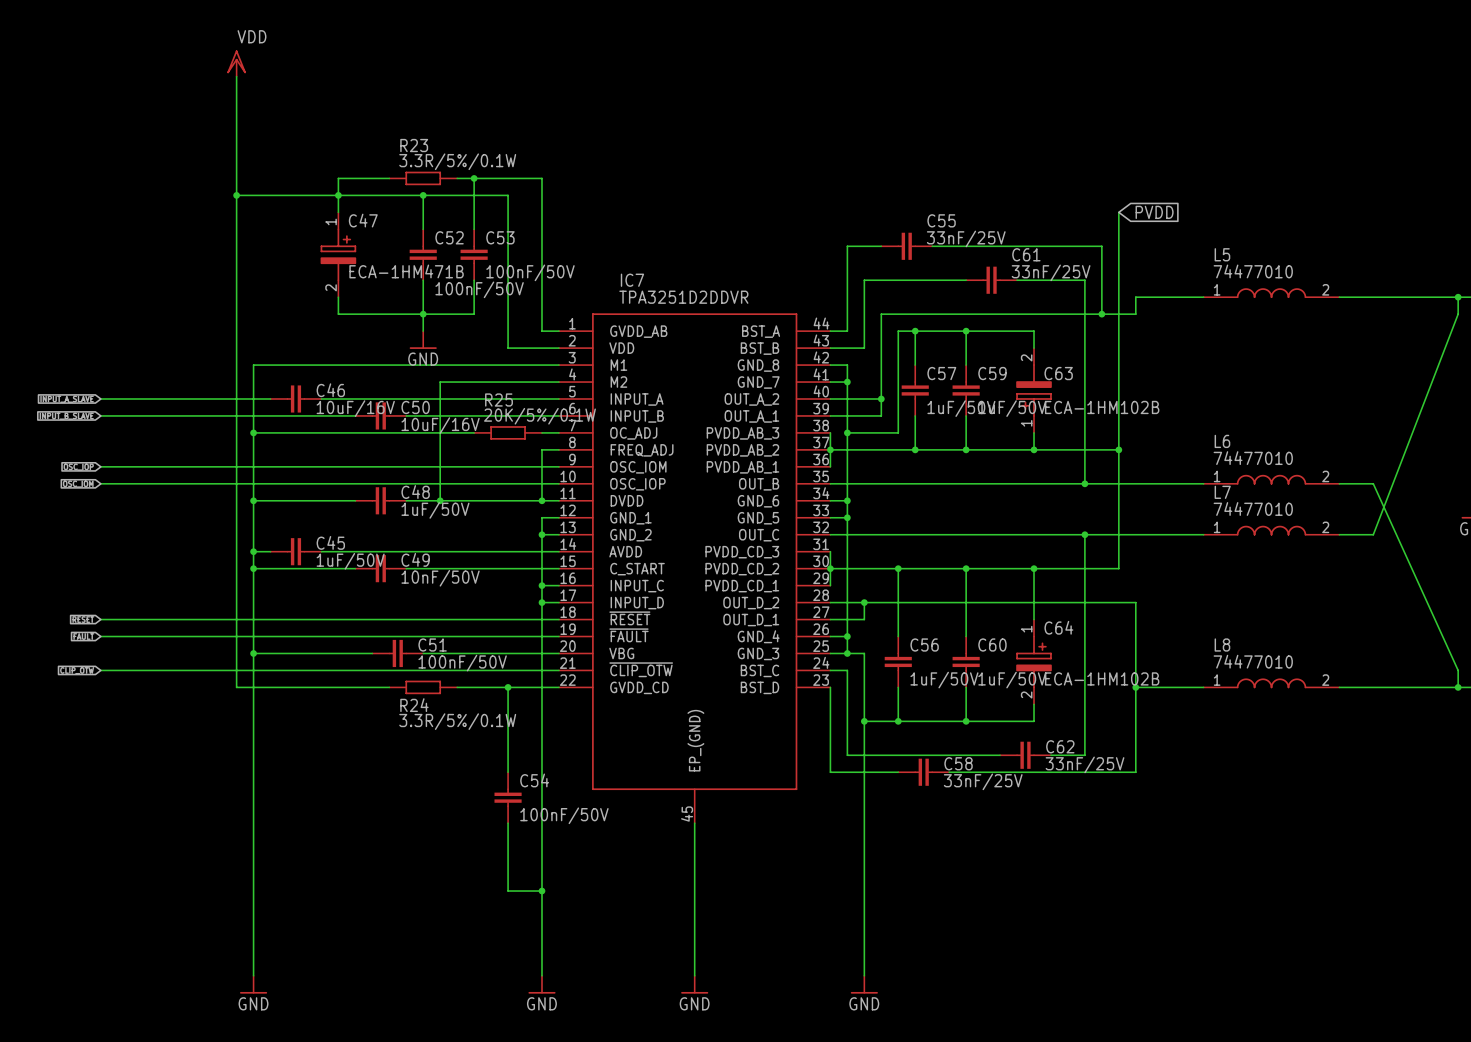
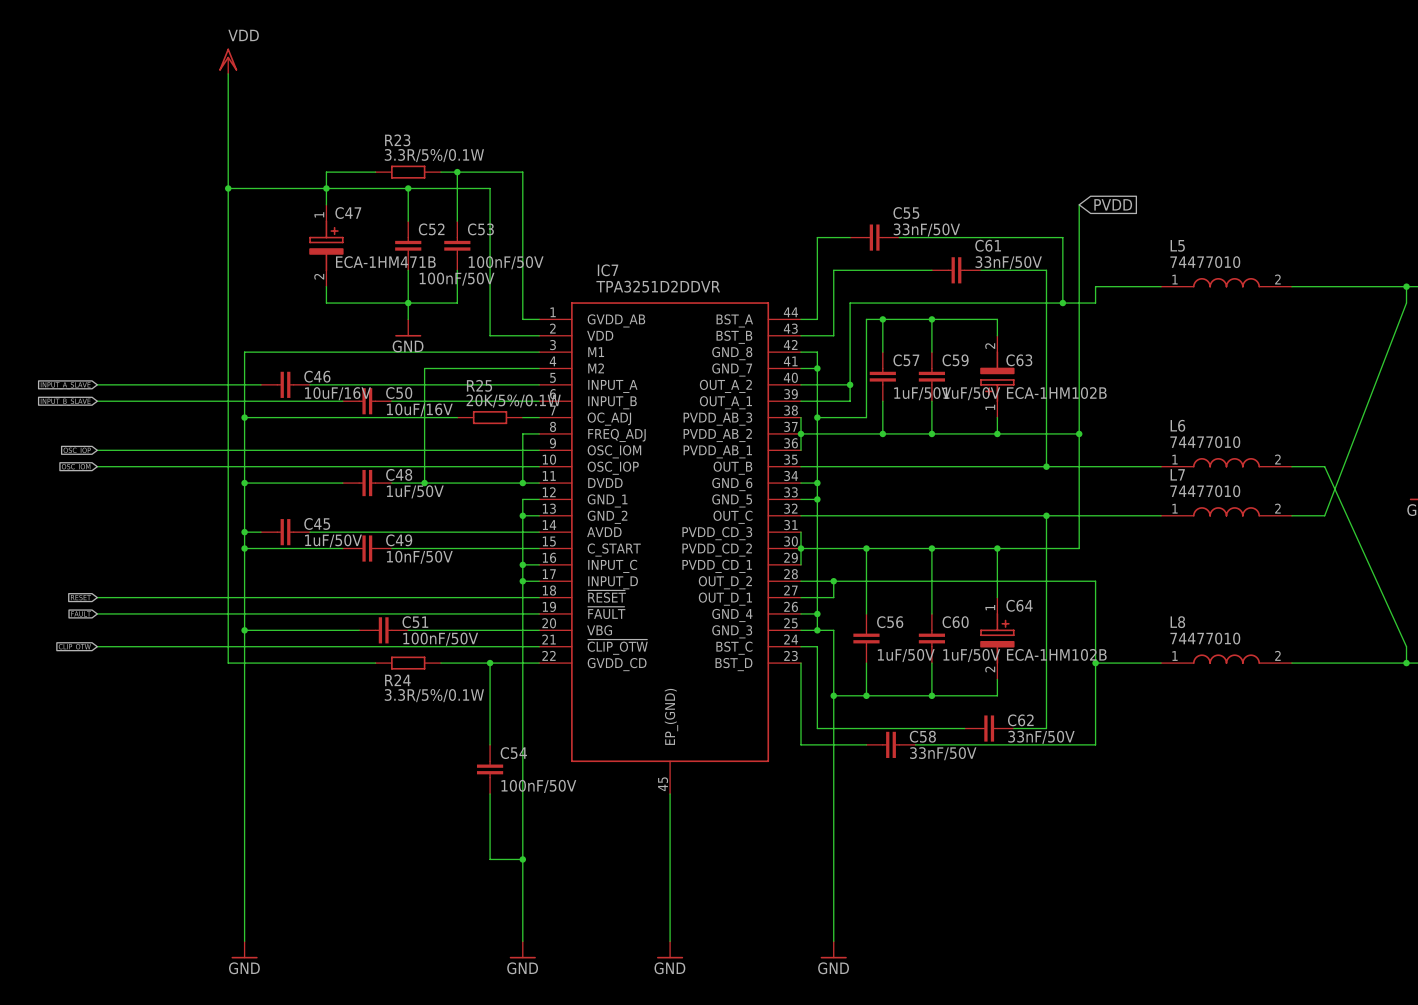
C55 value: 33nF/25V (966, 238) -> 33nF/50V (926, 230)
C61 value: 33nF/25V (1051, 272) -> 33nF/50V (1008, 262)
C62 value: 33nF/25V (1085, 764) -> 33nF/50V (1041, 737)
C58 value: 33nF/25V (983, 781) -> 33nF/50V (943, 753)

